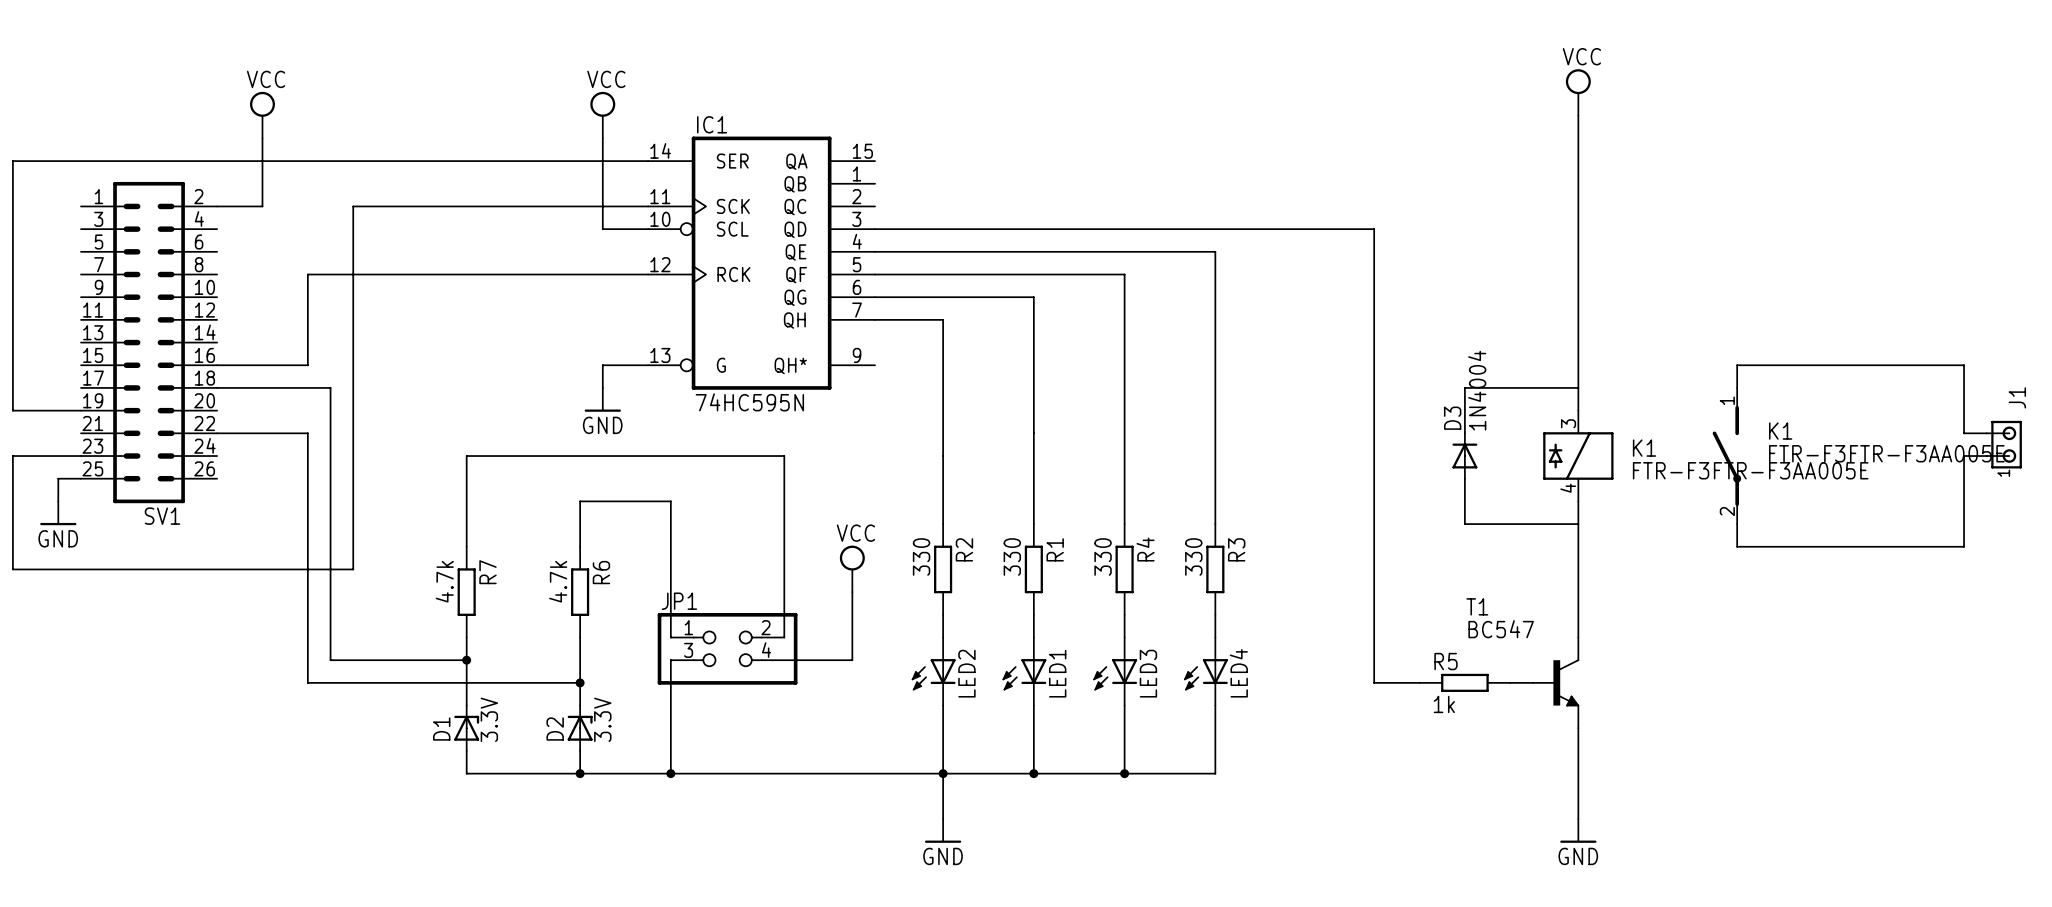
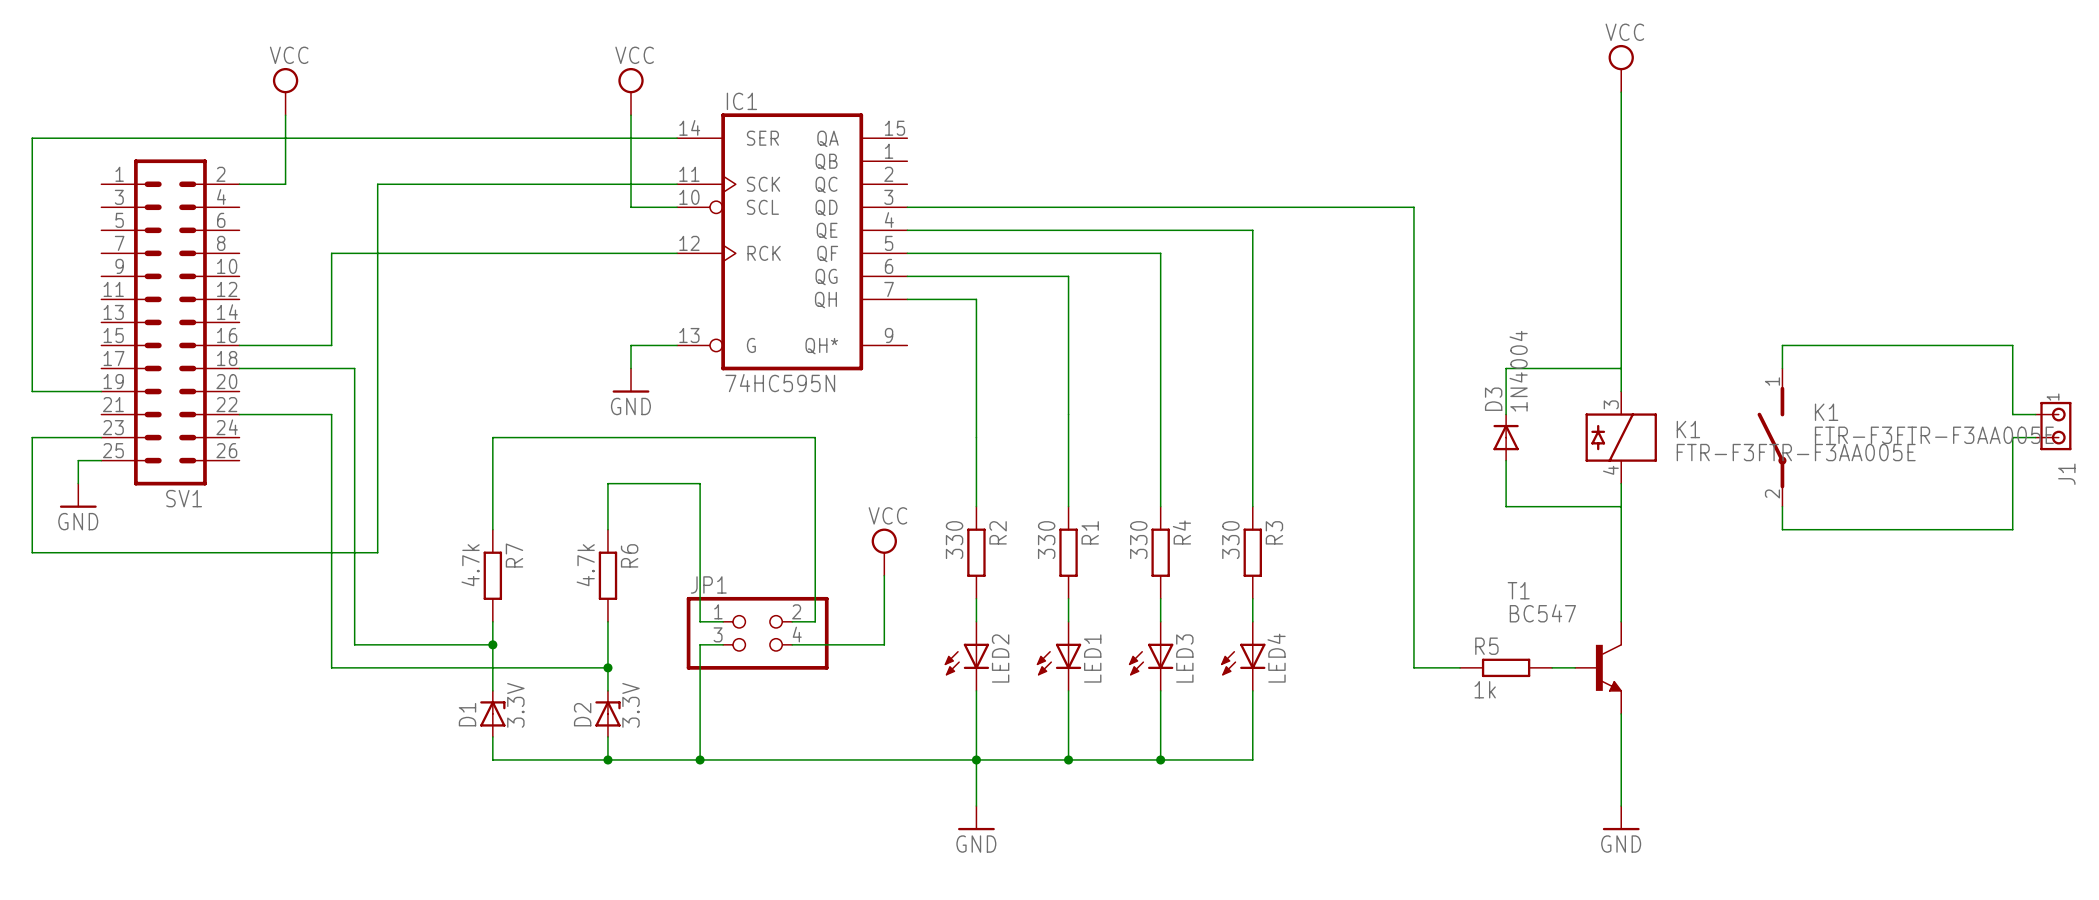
J1 flip: as is (2006, 444) -> up-down (2055, 426)

